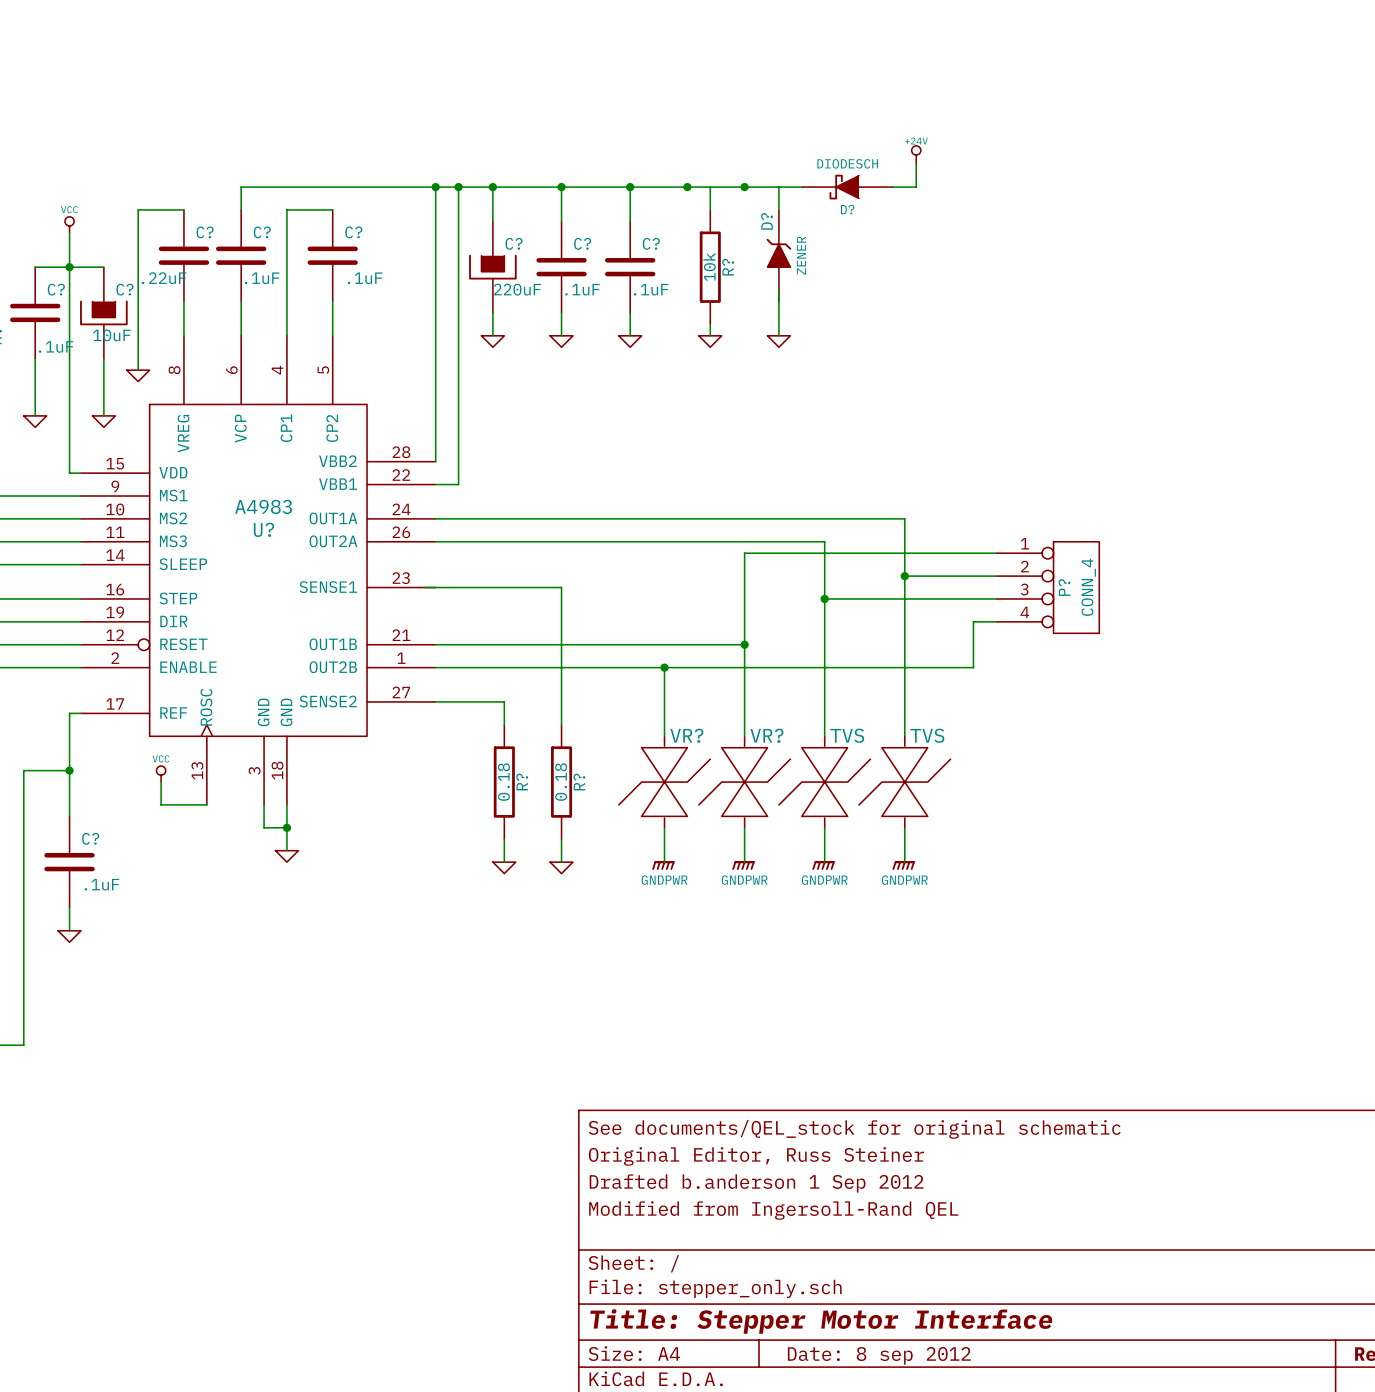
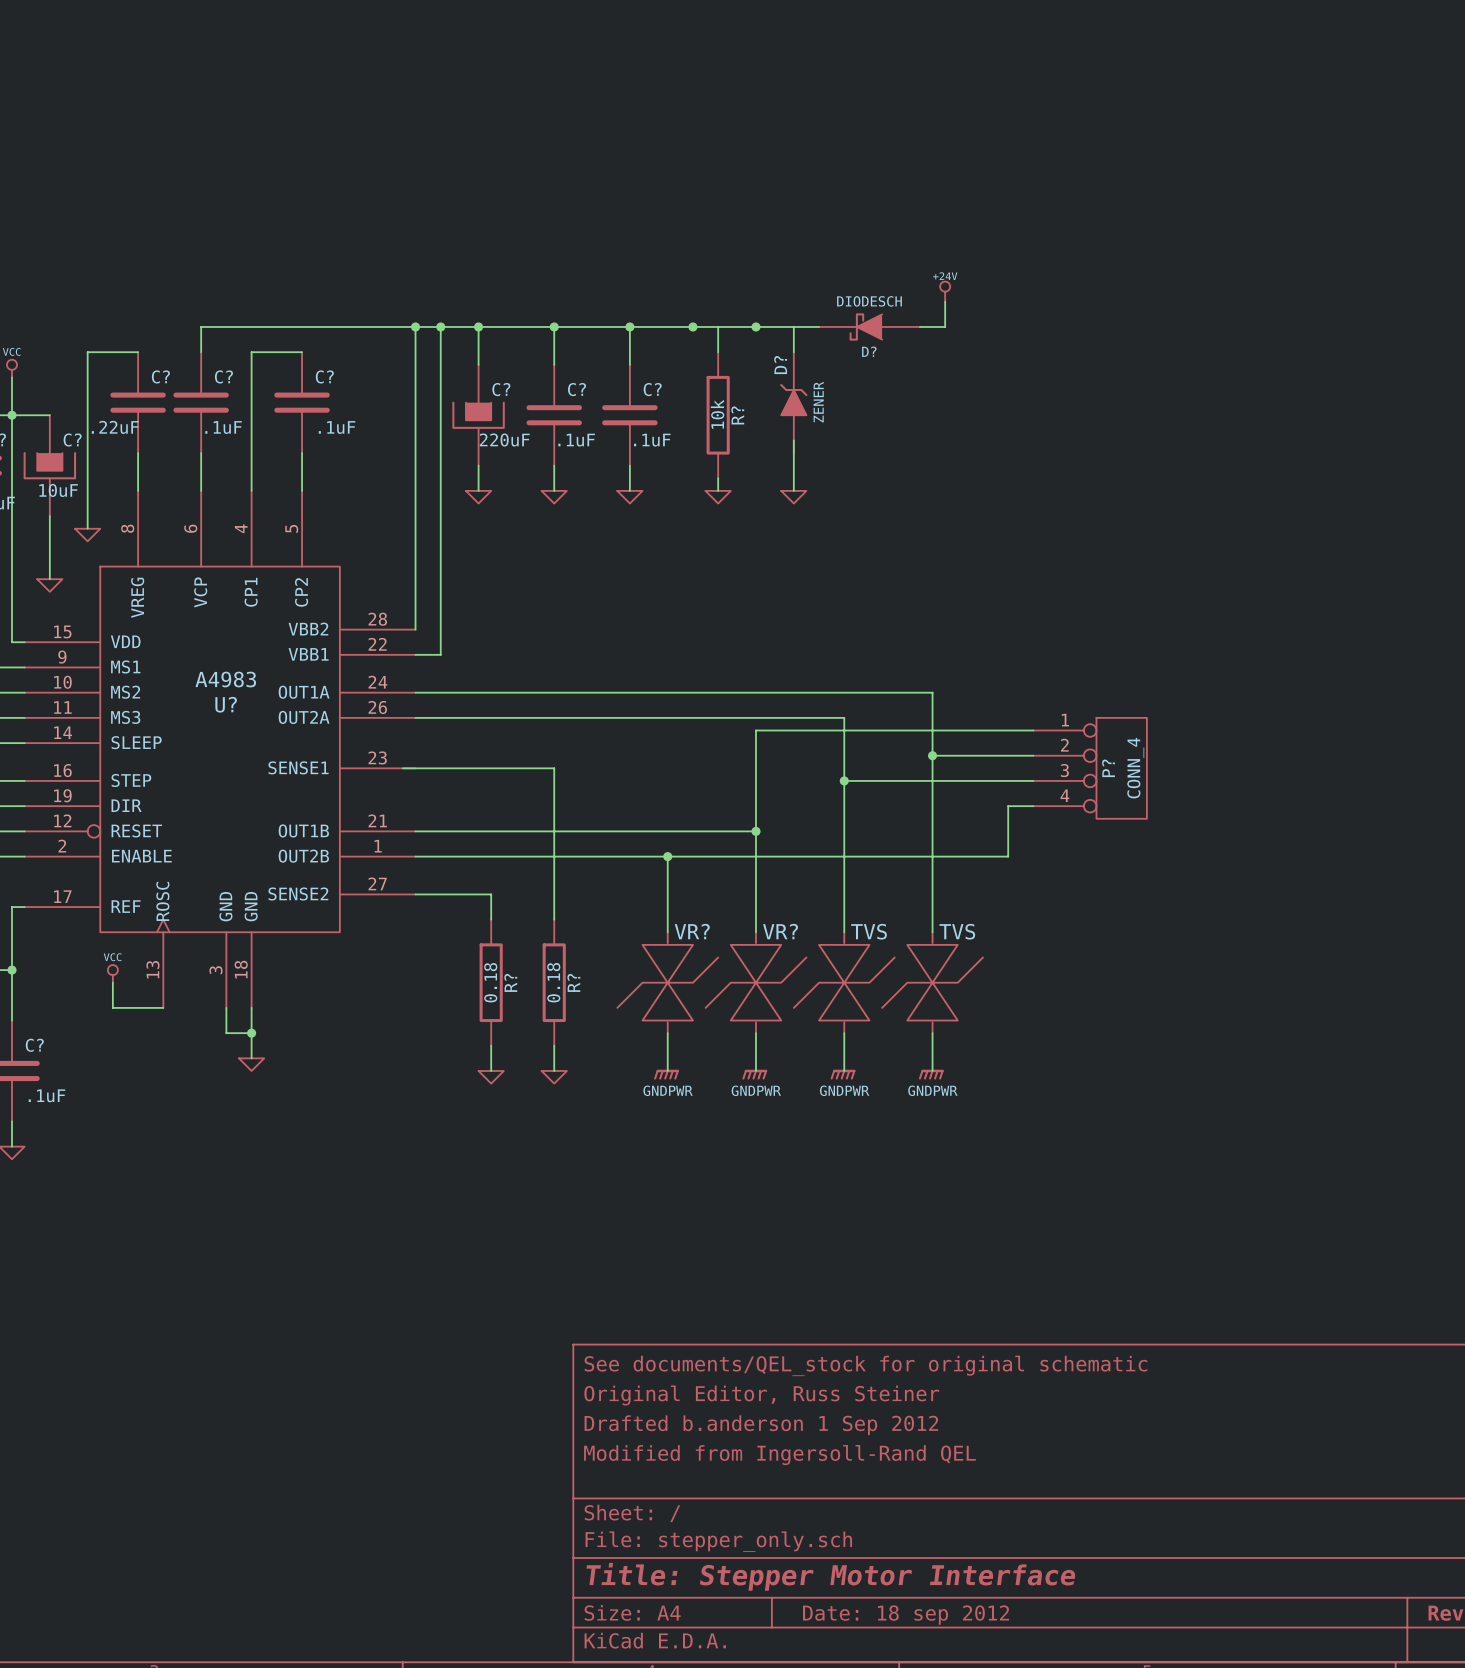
title block: Date: 8 sep 2012 (879, 1355) -> Date: 18 sep 2012 (906, 1615)

